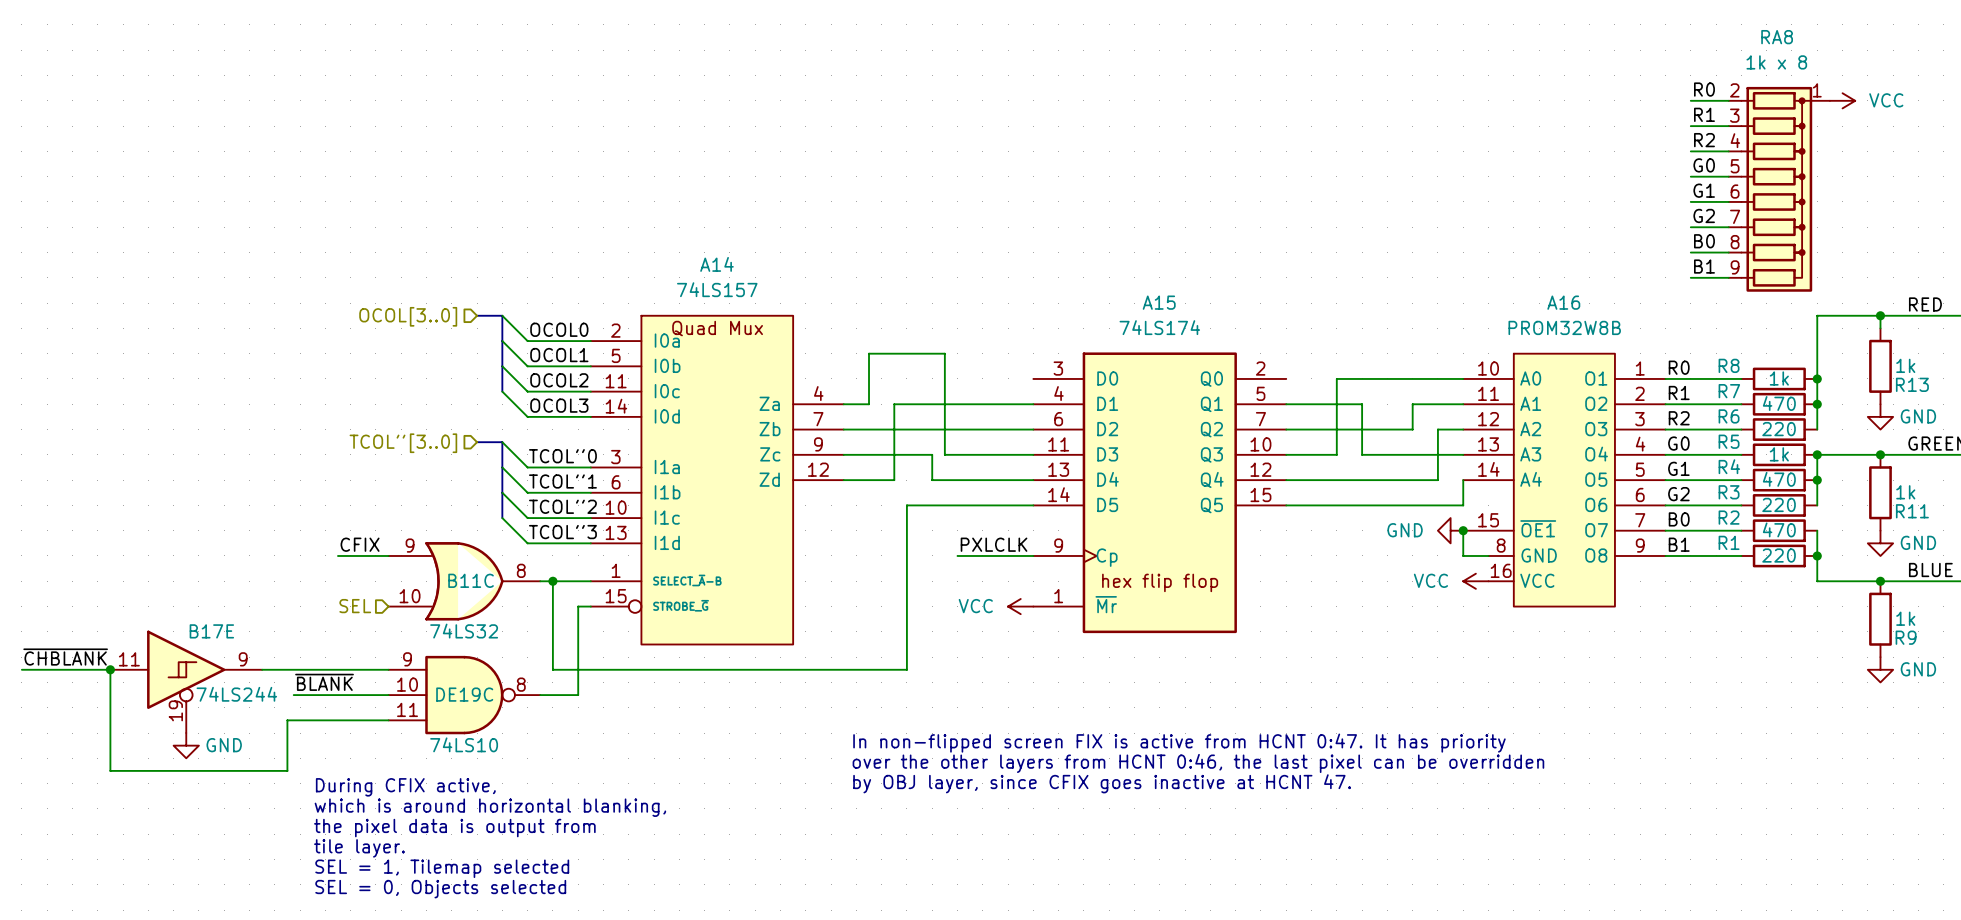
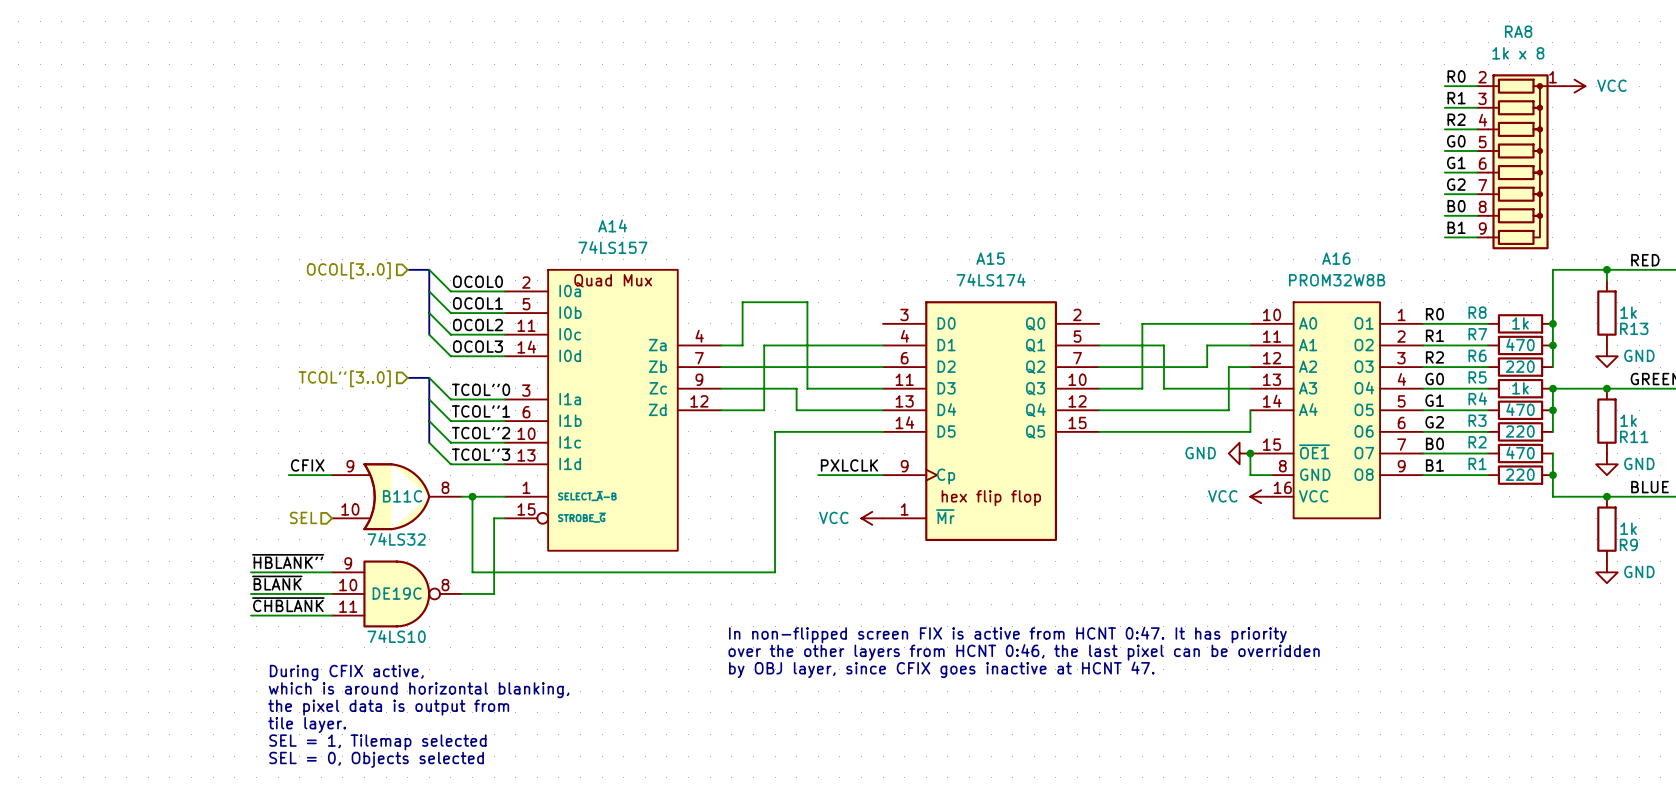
label: ~{CHBLANK} (65, 657) -> none
label: none -> ~{HBLANK''} (288, 561)
wire: (21, 669) (110, 669) (110, 770) (287, 770) (287, 720) (293, 720) -> none
junction: (110, 669) -> none
wire: (262, 669) (293, 669) -> none
B17E: 74LS244 (186, 681) -> none
label: none -> ~{CHBLANK} (288, 604)
power symbol: GND (186, 745) -> none

